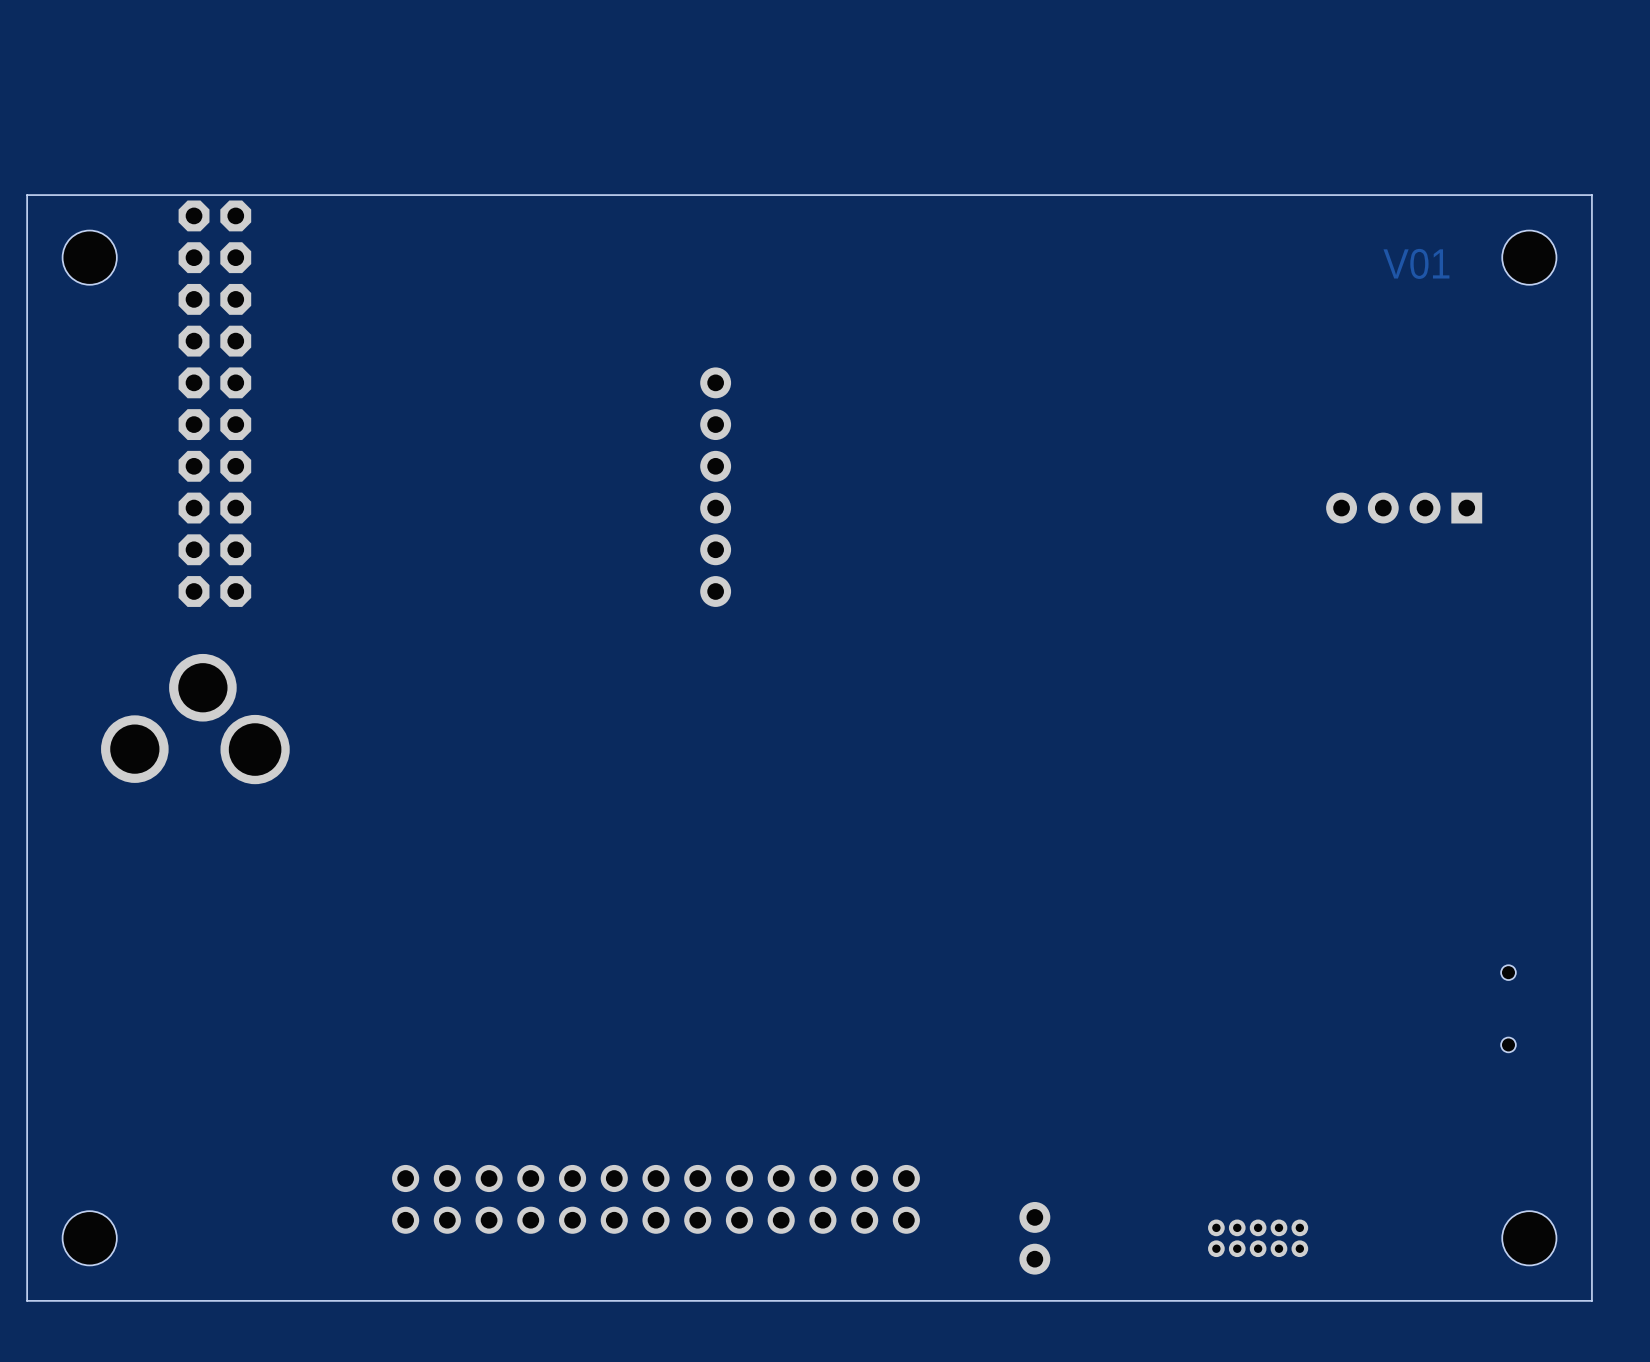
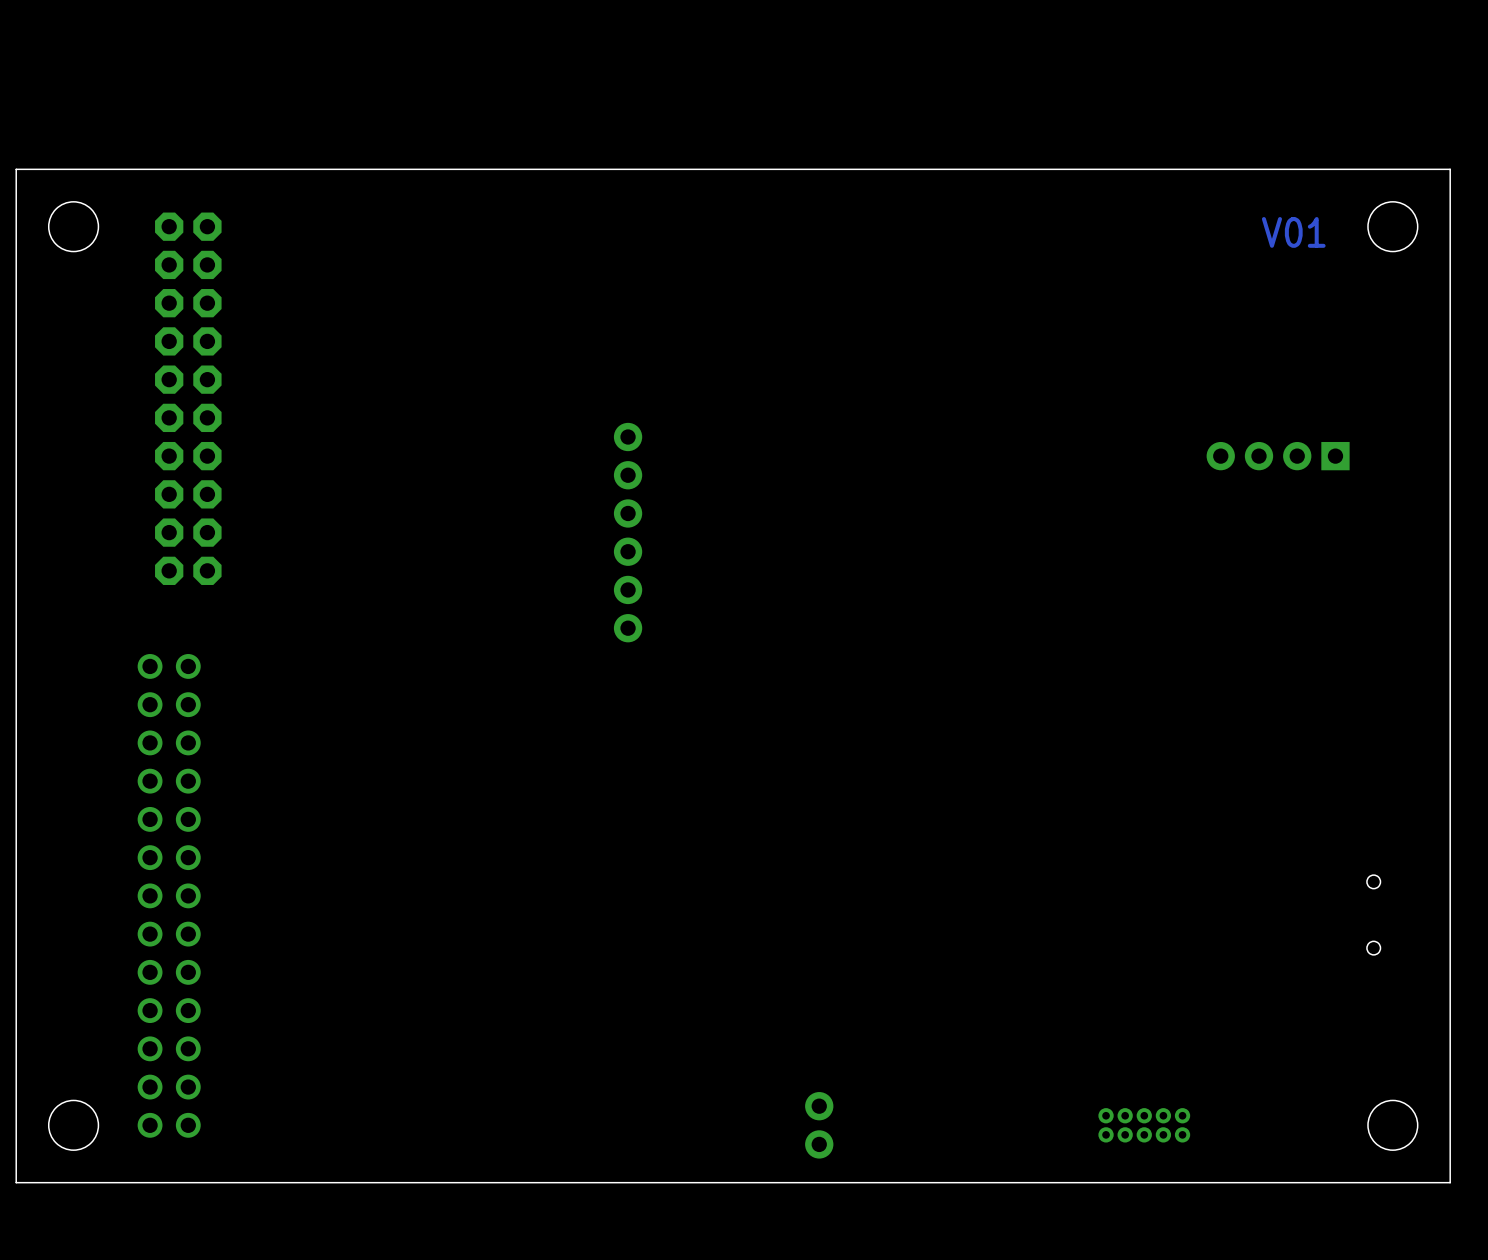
part position: (214, 403) -> (188, 398)
part position: (715, 487) -> (628, 532)
part: (195, 719) -> none
part: none -> (169, 895)
part: (656, 1199) -> none
part position: (1034, 1238) -> (819, 1125)

